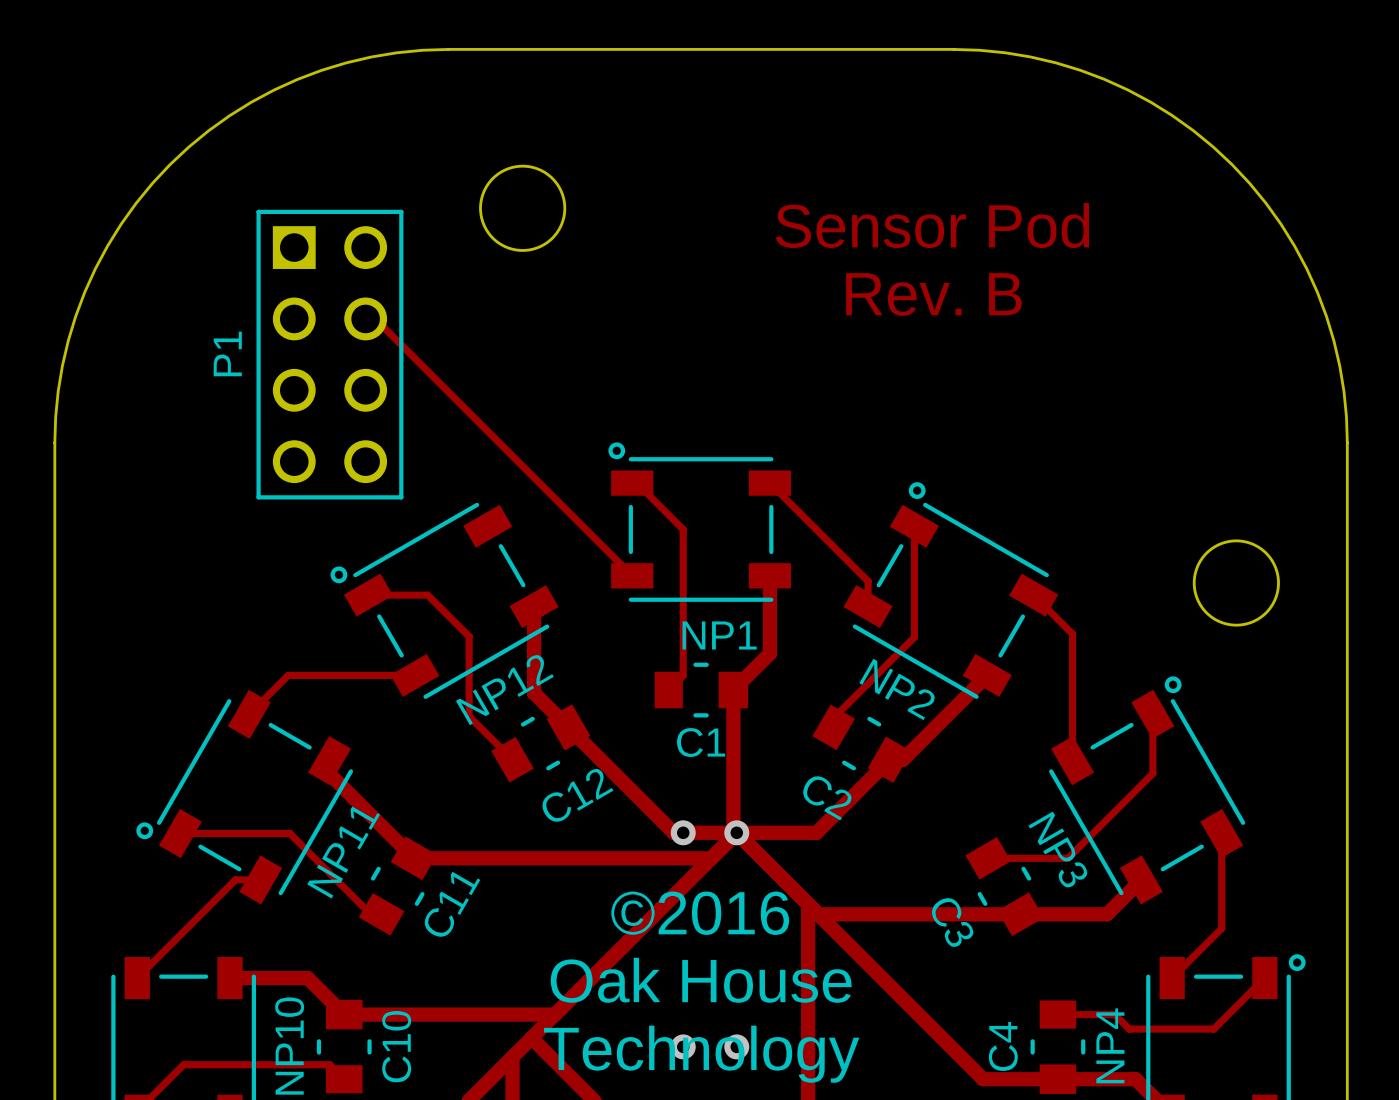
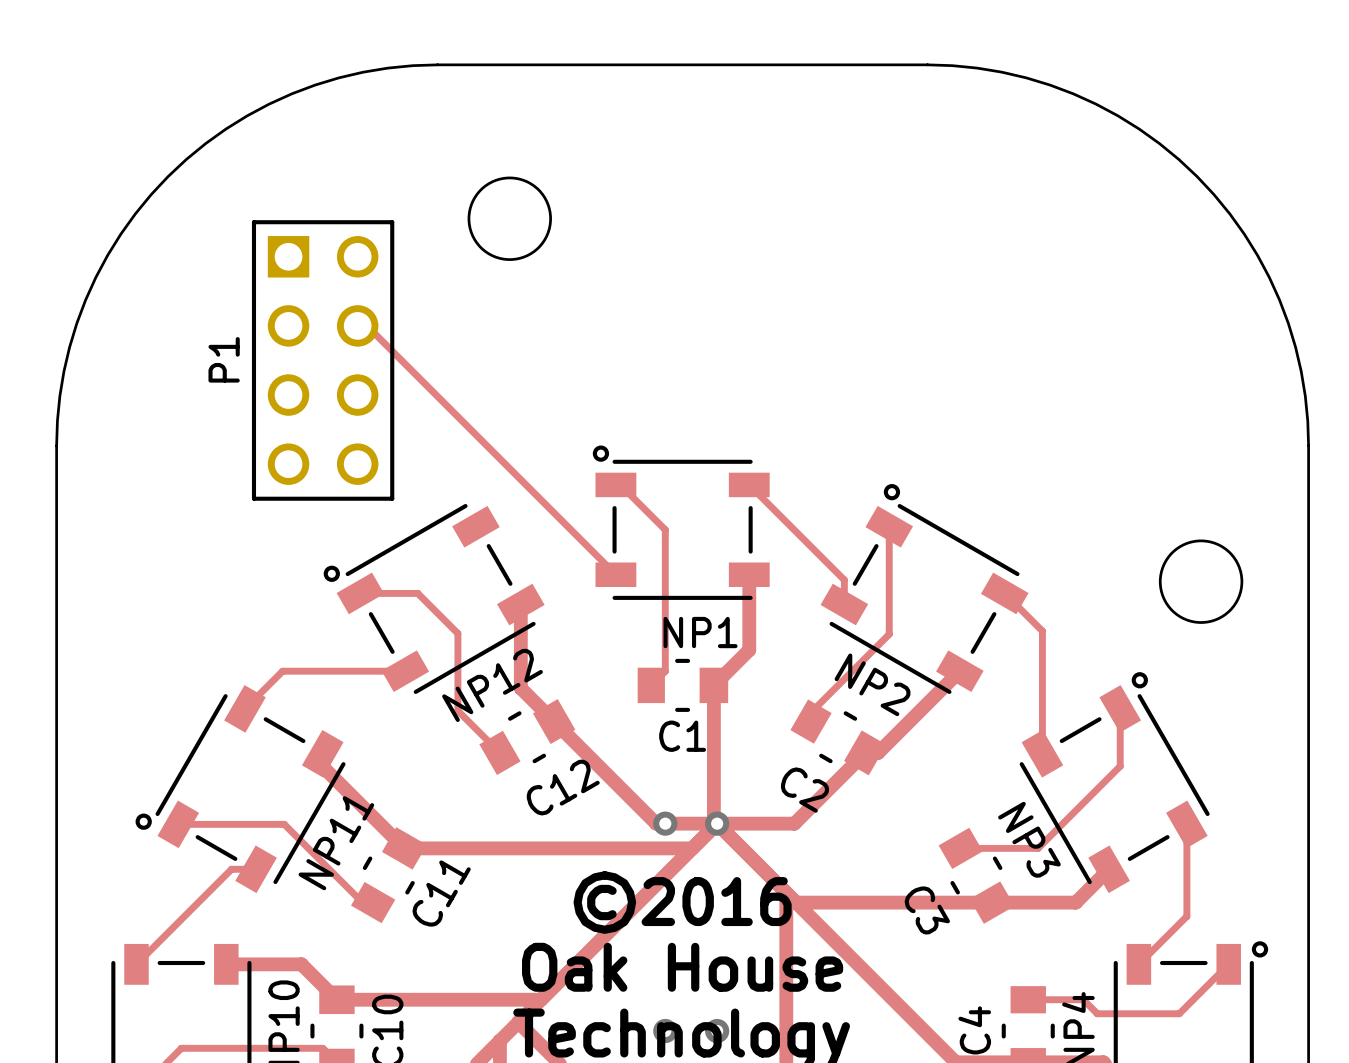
text: Sensor Pod (932, 225) -> none
text: Rev. B (933, 294) -> none

